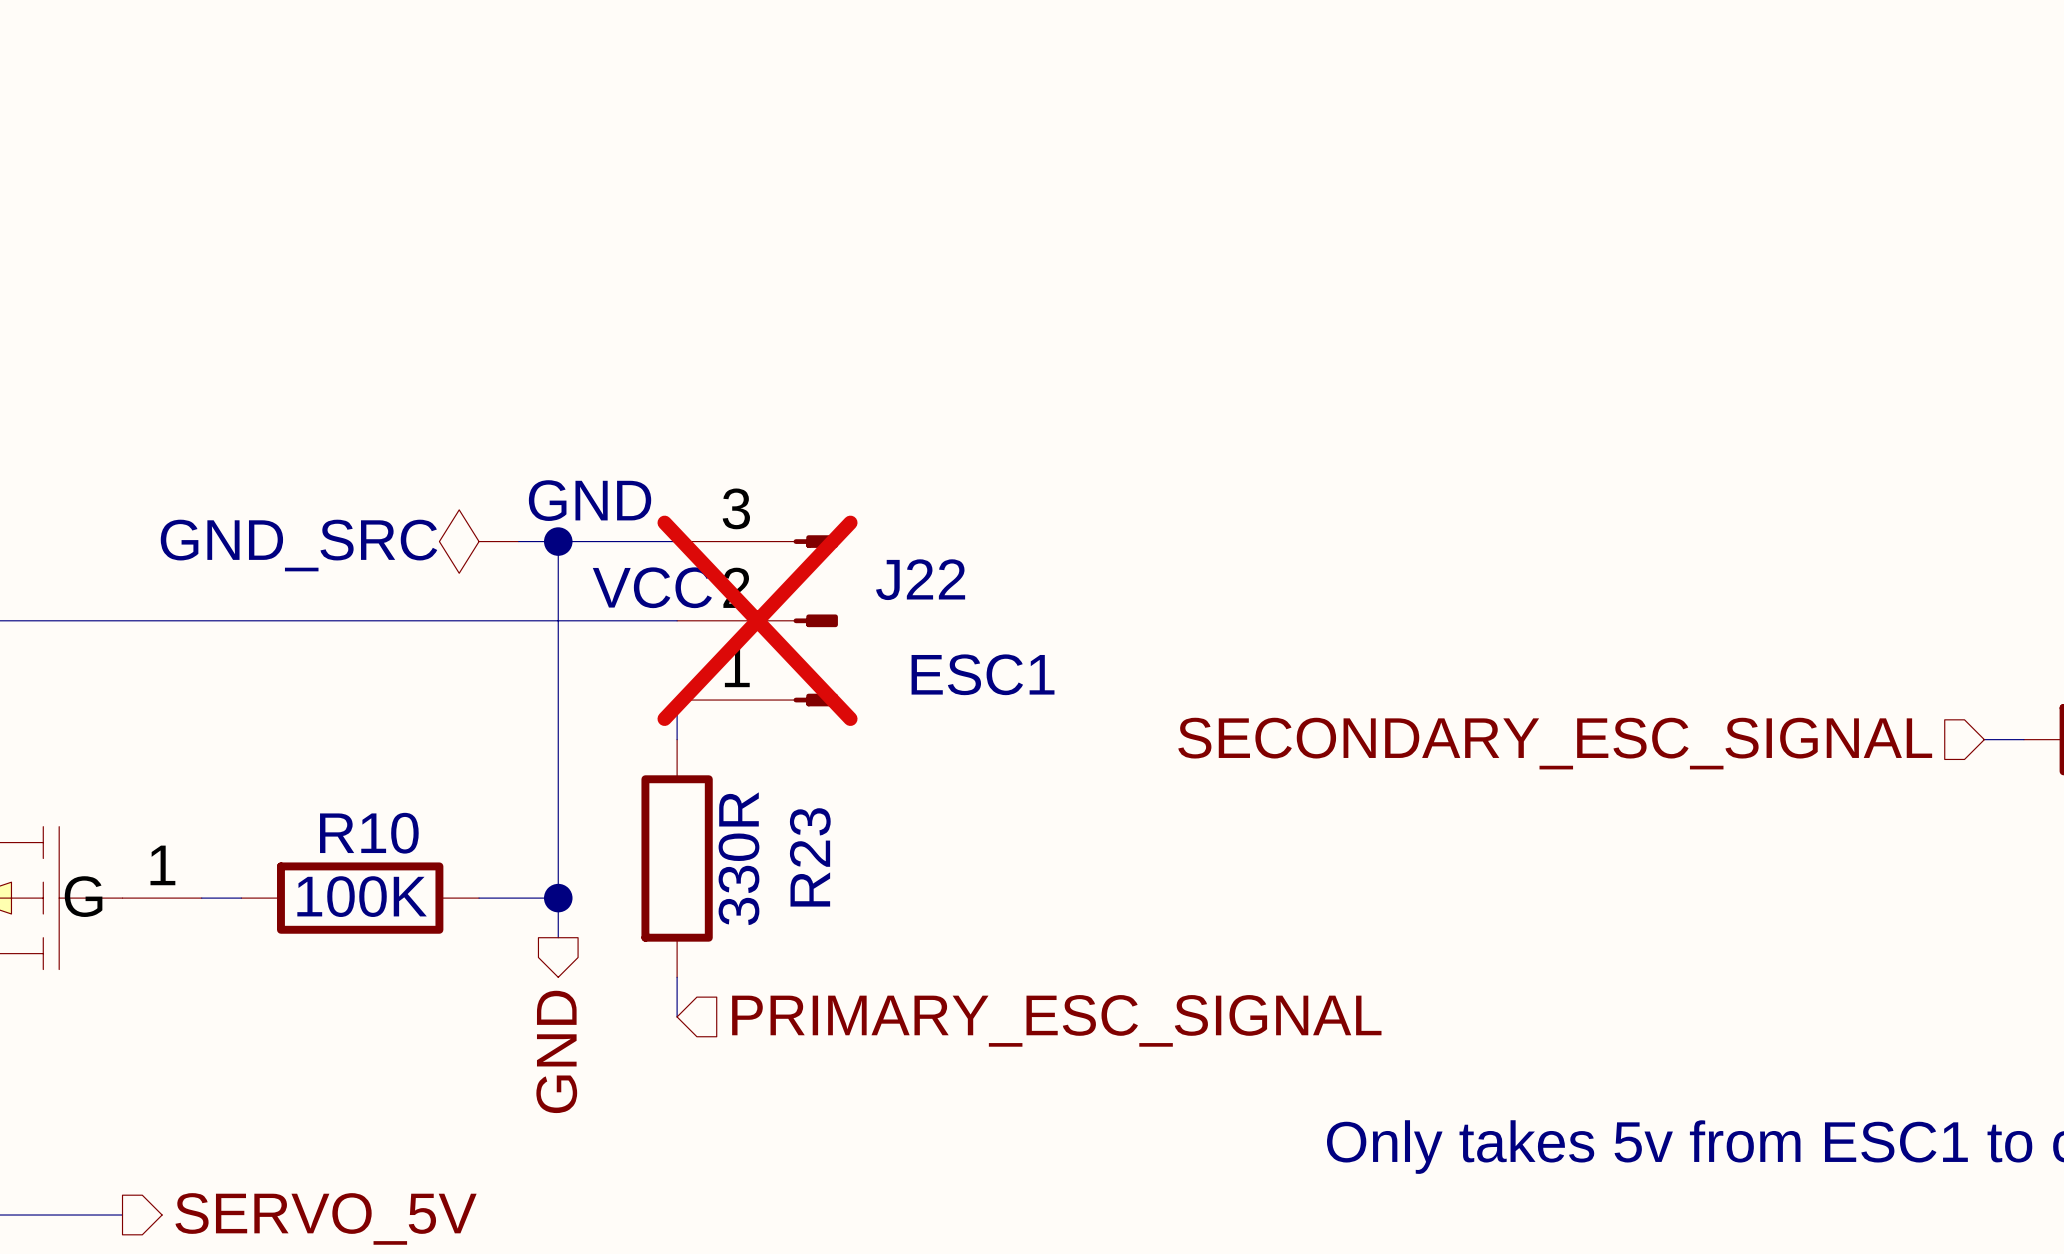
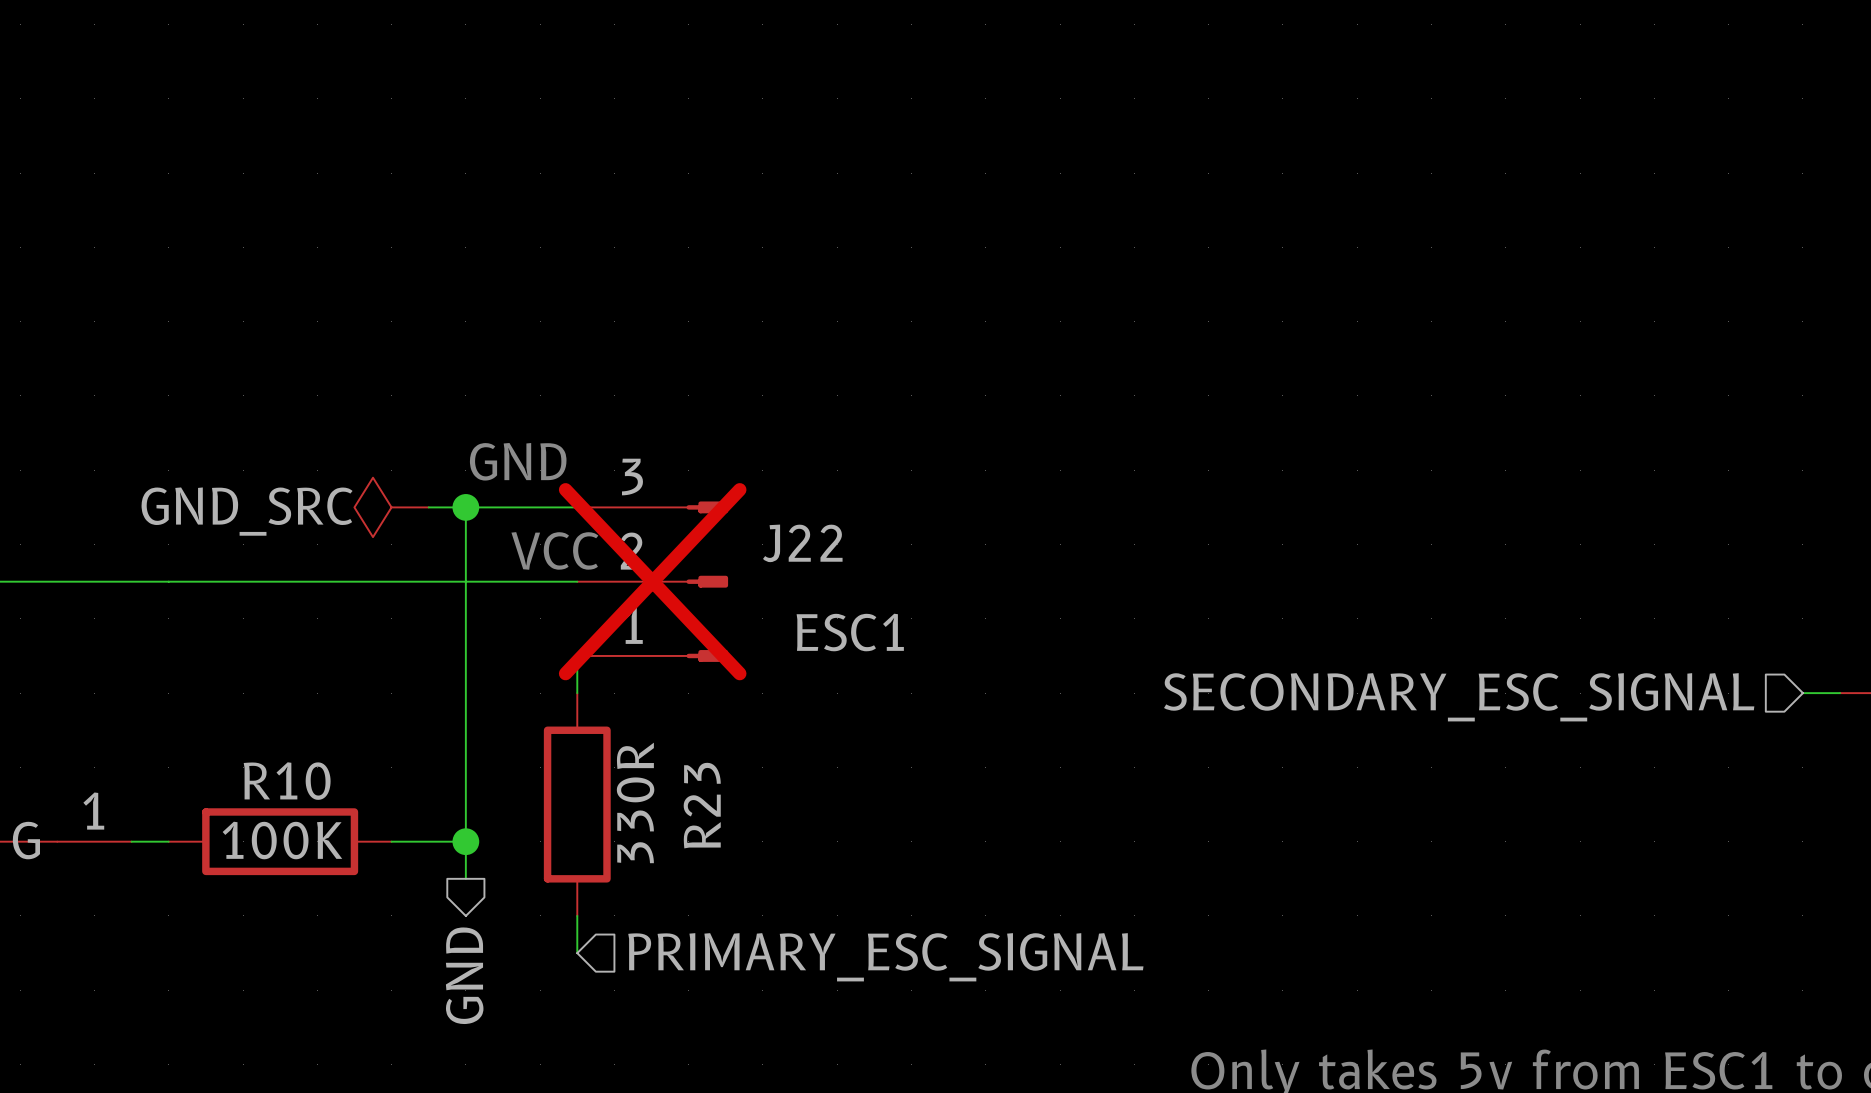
text position: GND (590, 500) -> GND (518, 461)

